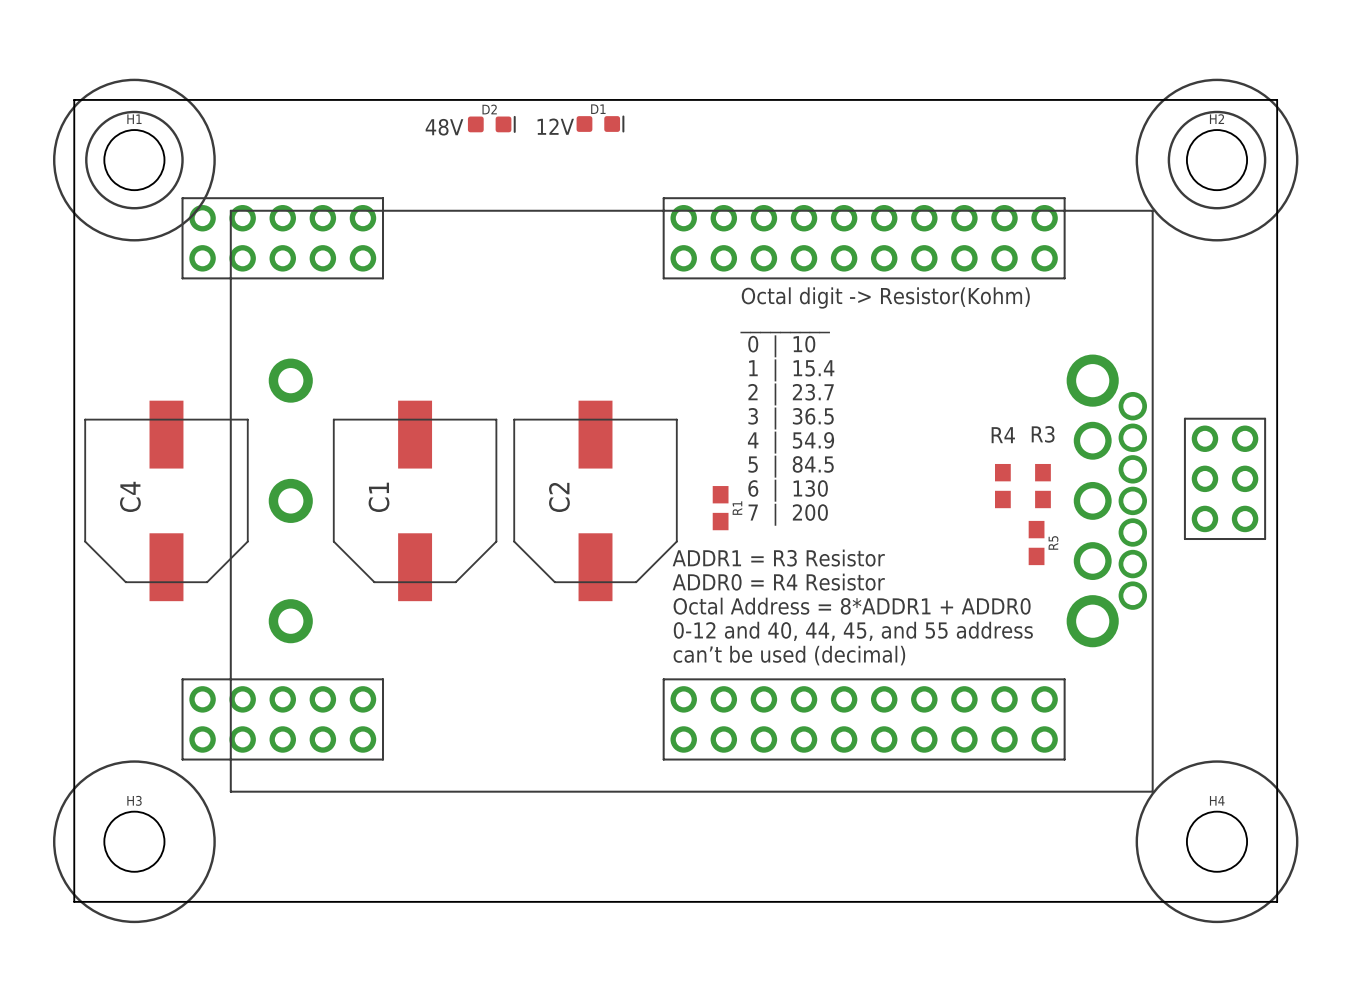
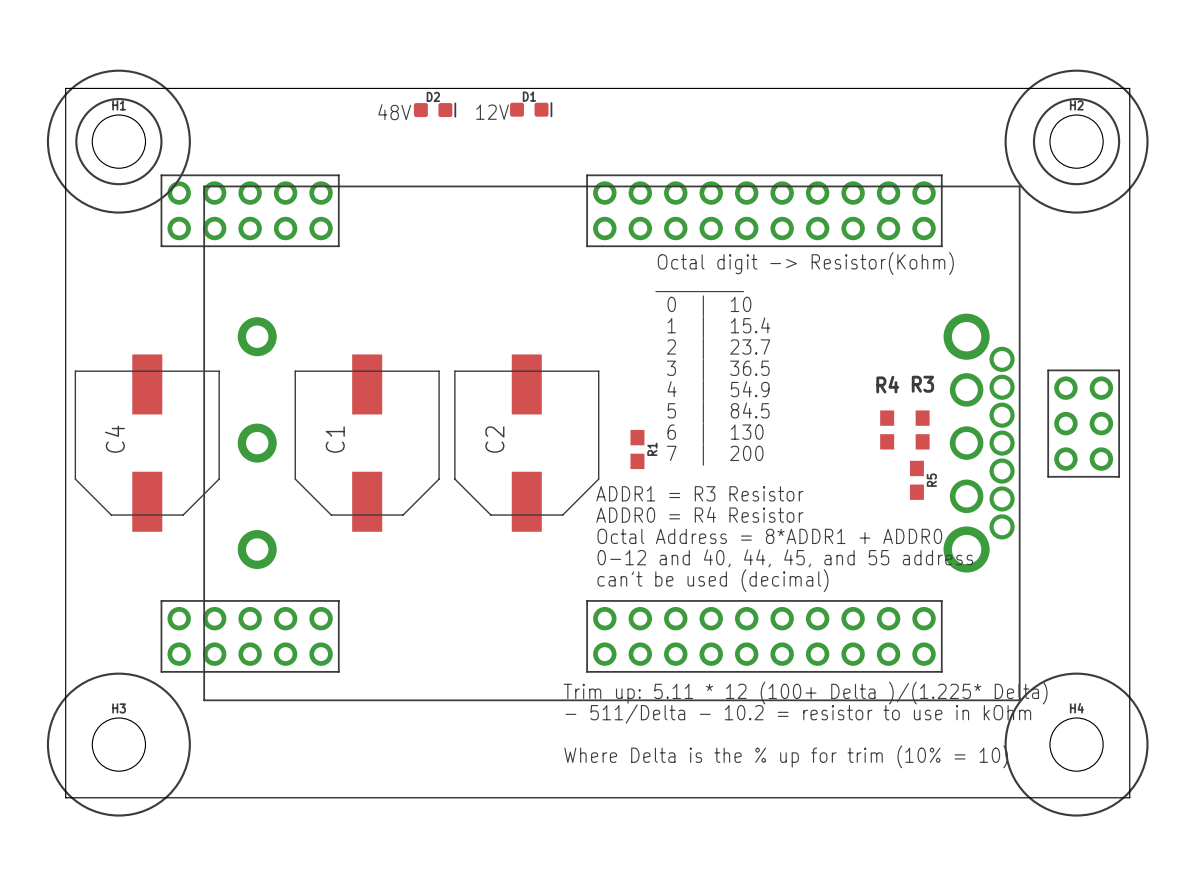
text: none -> Trim up: 5.11 * 12 (100+ Delta )/(1.225* Delta) (805, 693)
text: none -> - 511/Delta - 10.2 = resistor to use in kOhm (798, 714)
text: none -> Where Delta is the % up for trim (10% = 10) (786, 756)

